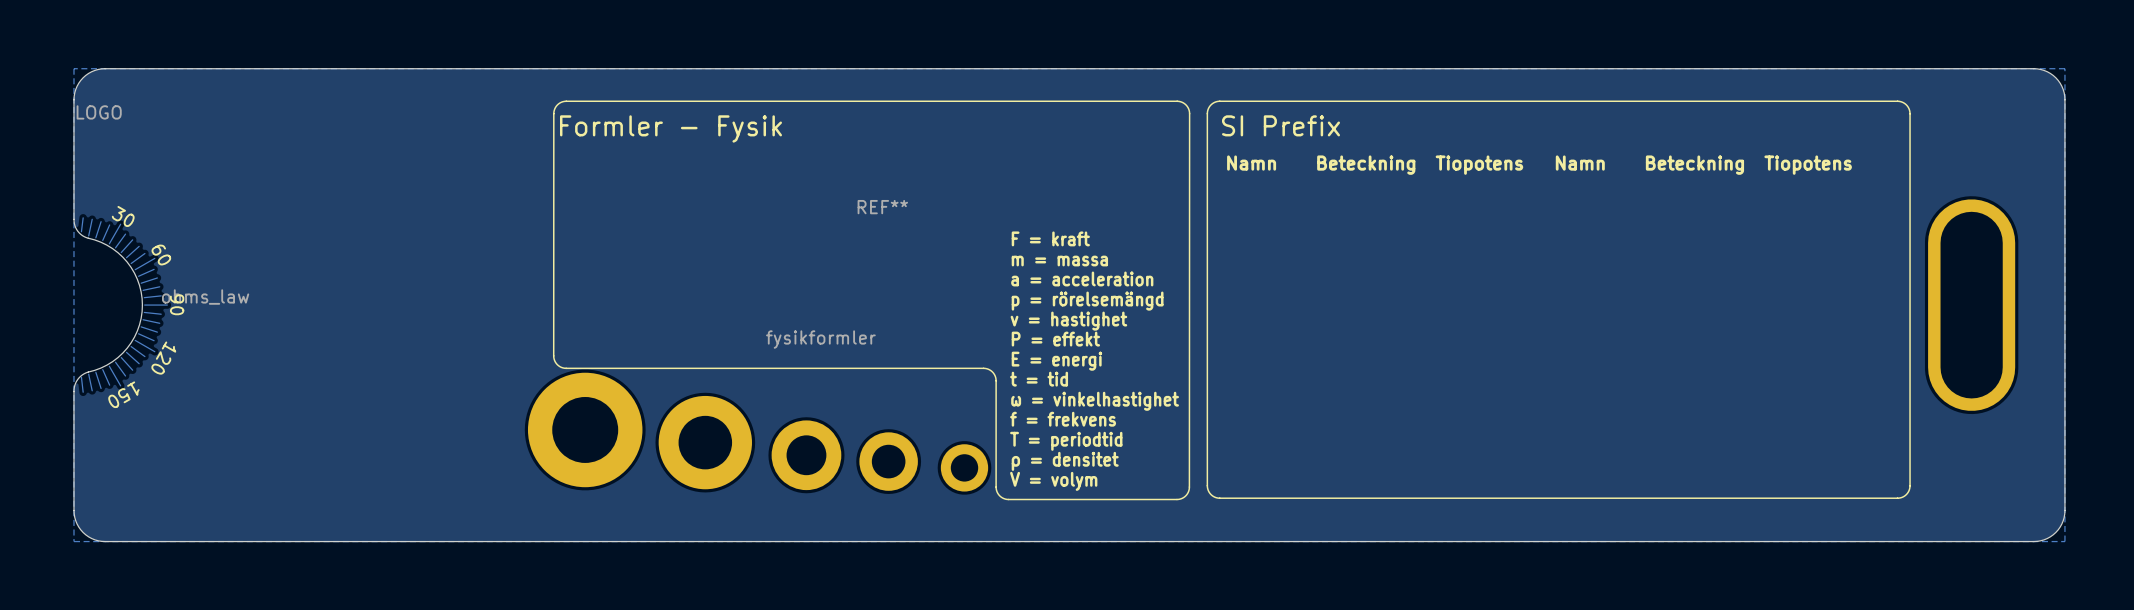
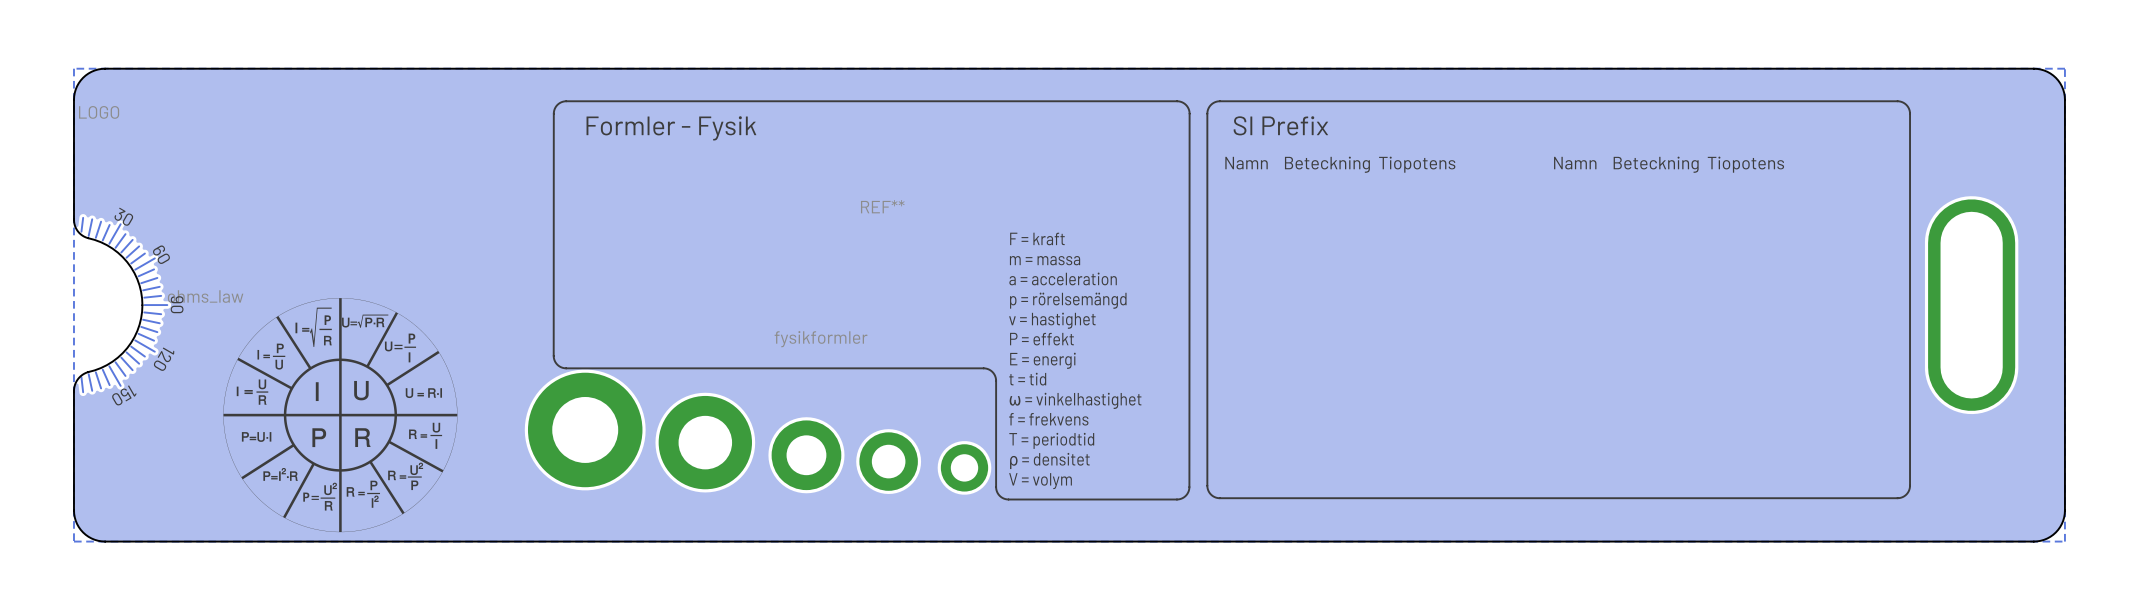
drawing: none -> [223, 298, 458, 533]

